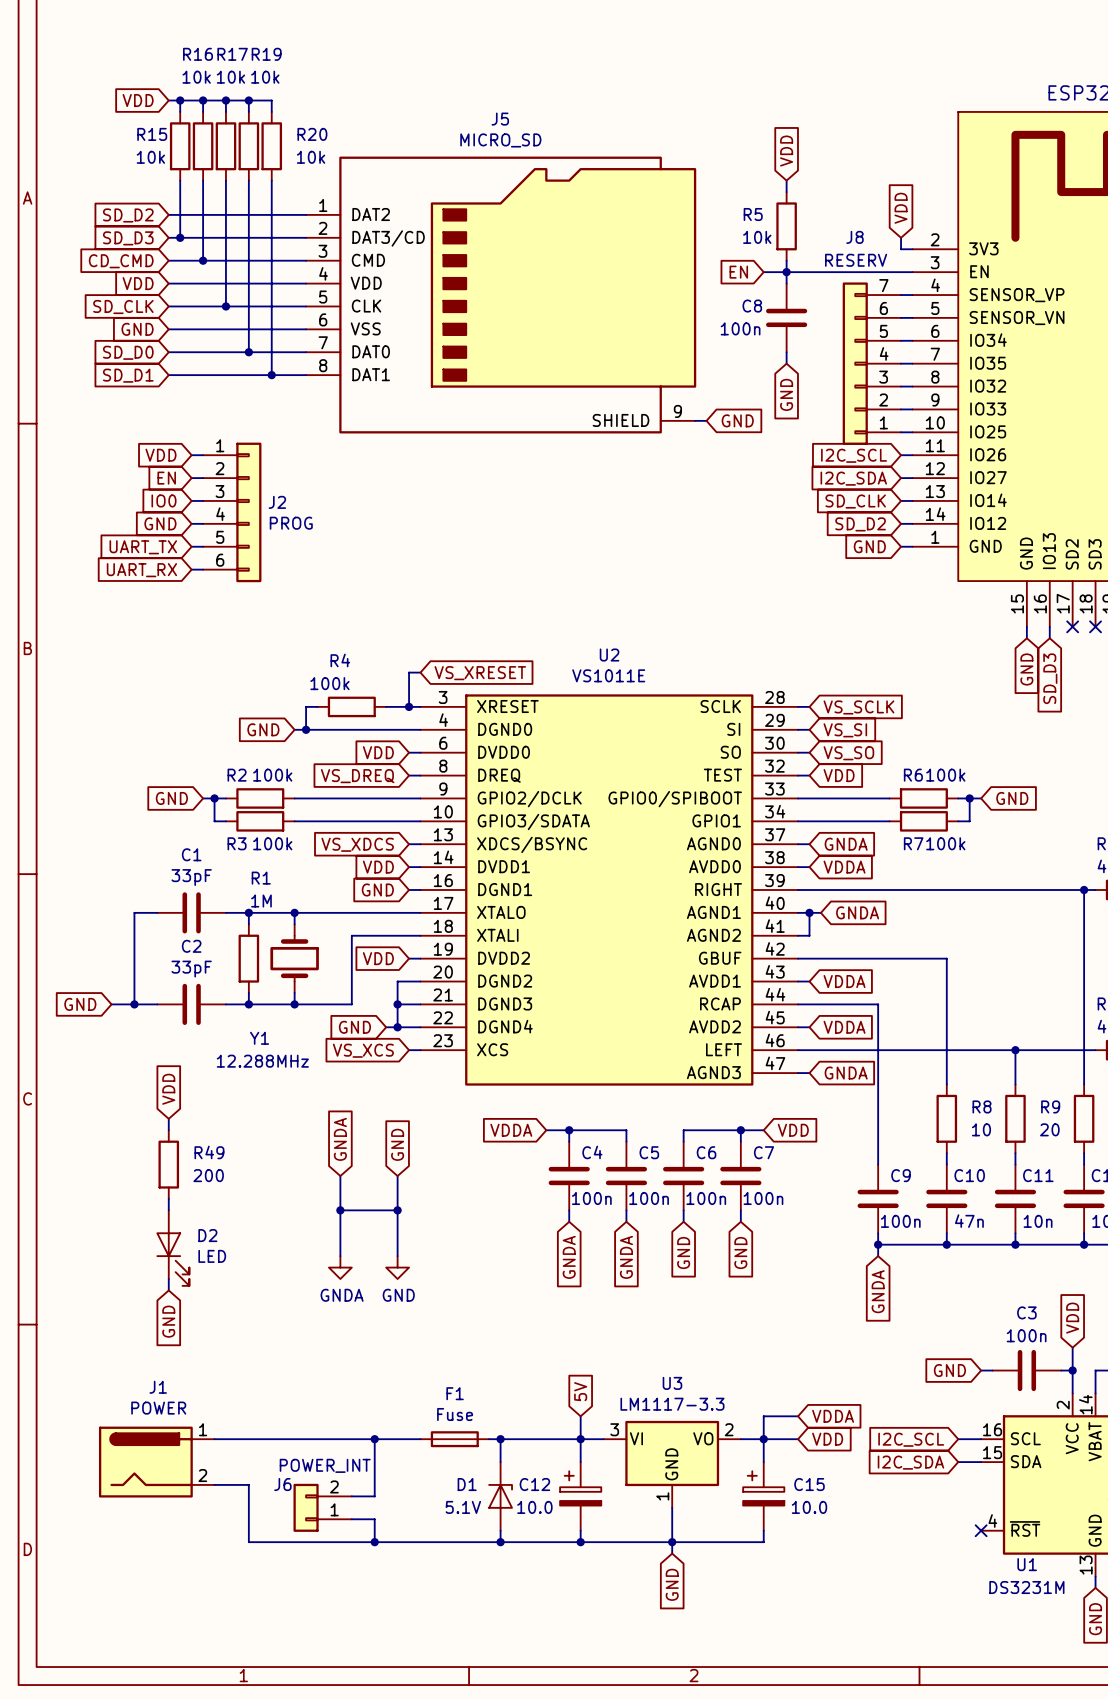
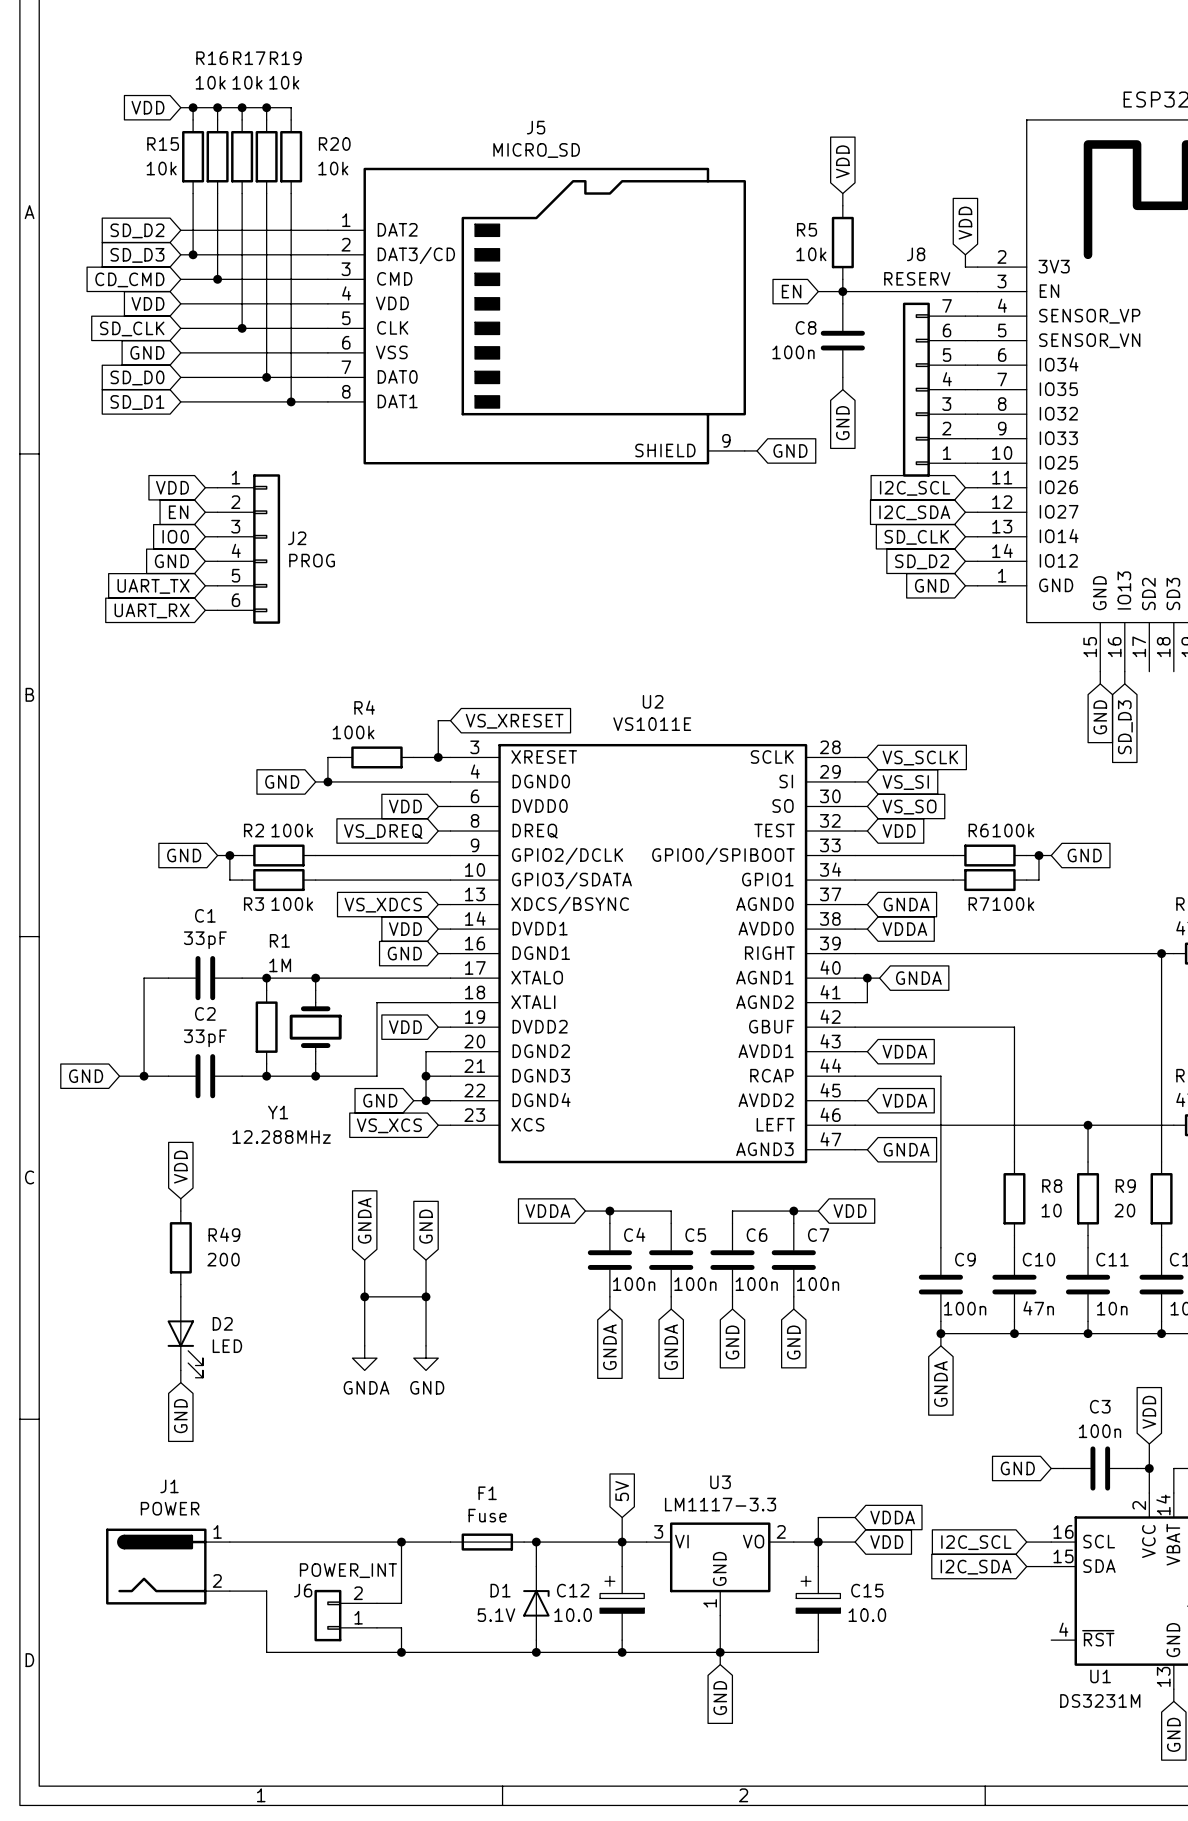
no-connect mark: (1072, 626) -> none
no-connect mark: (1095, 626) -> none
no-connect mark: (981, 1530) -> none

